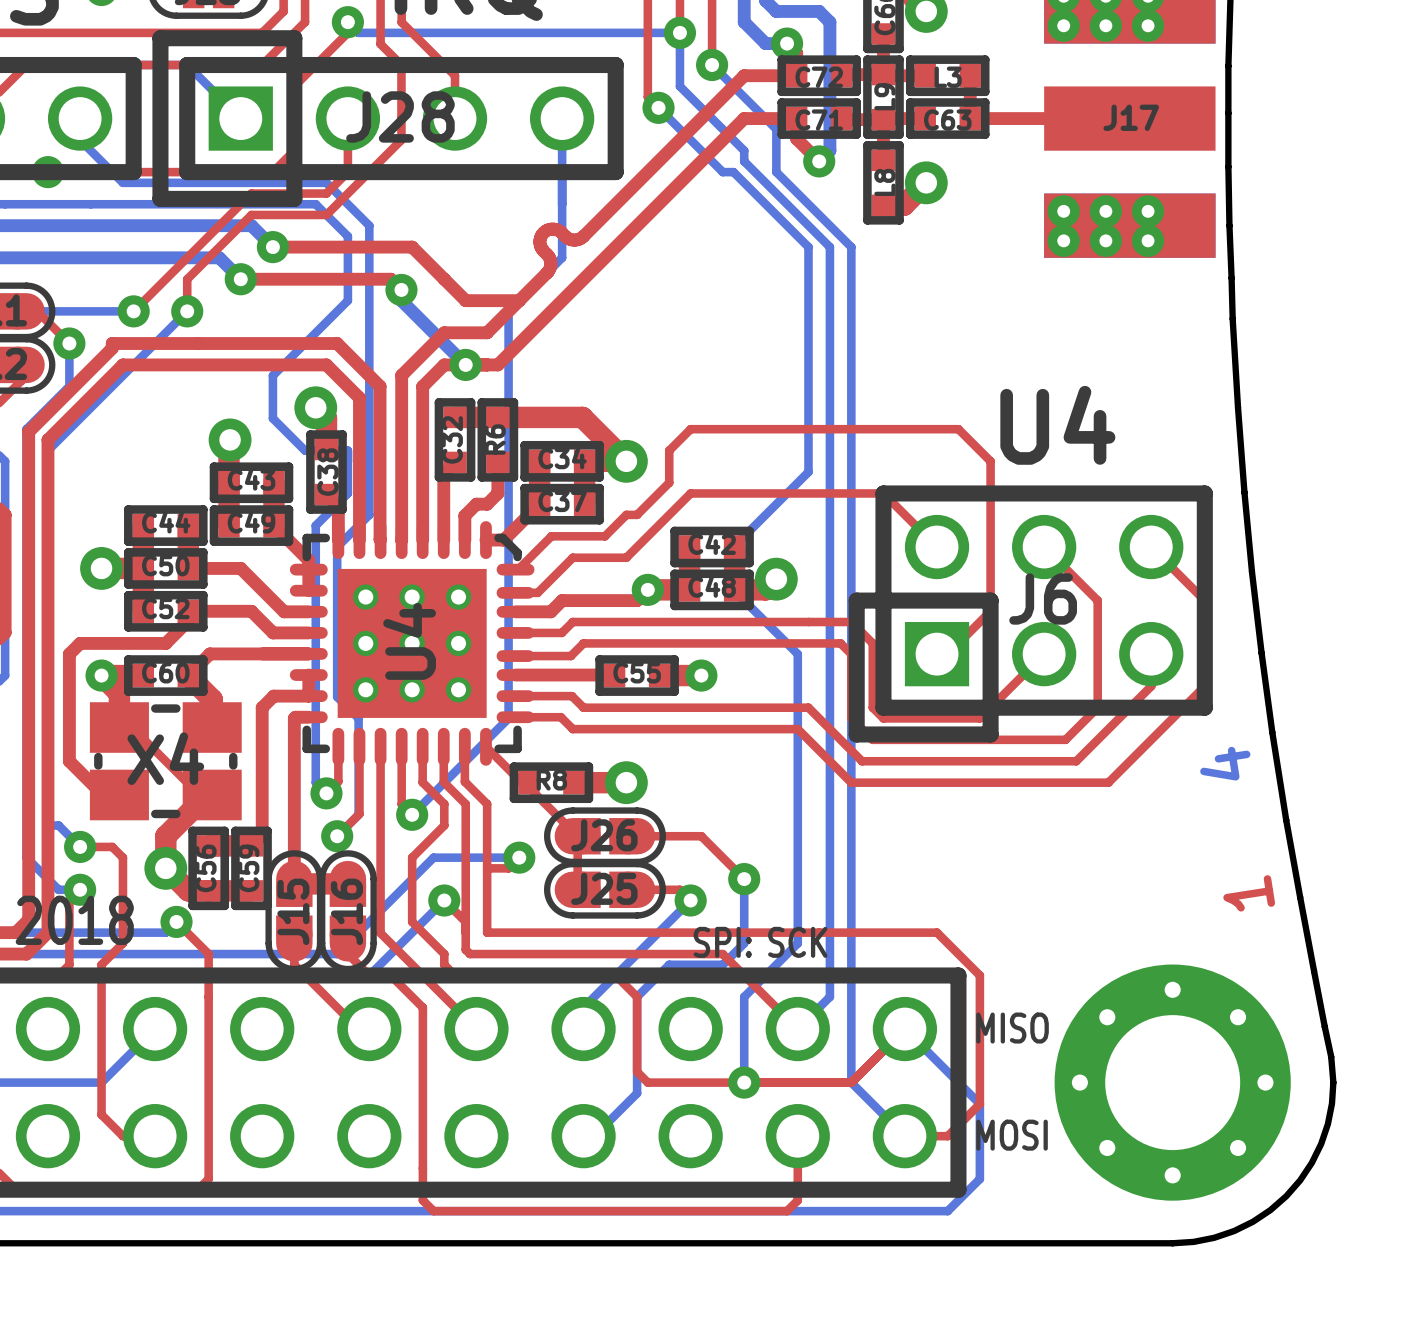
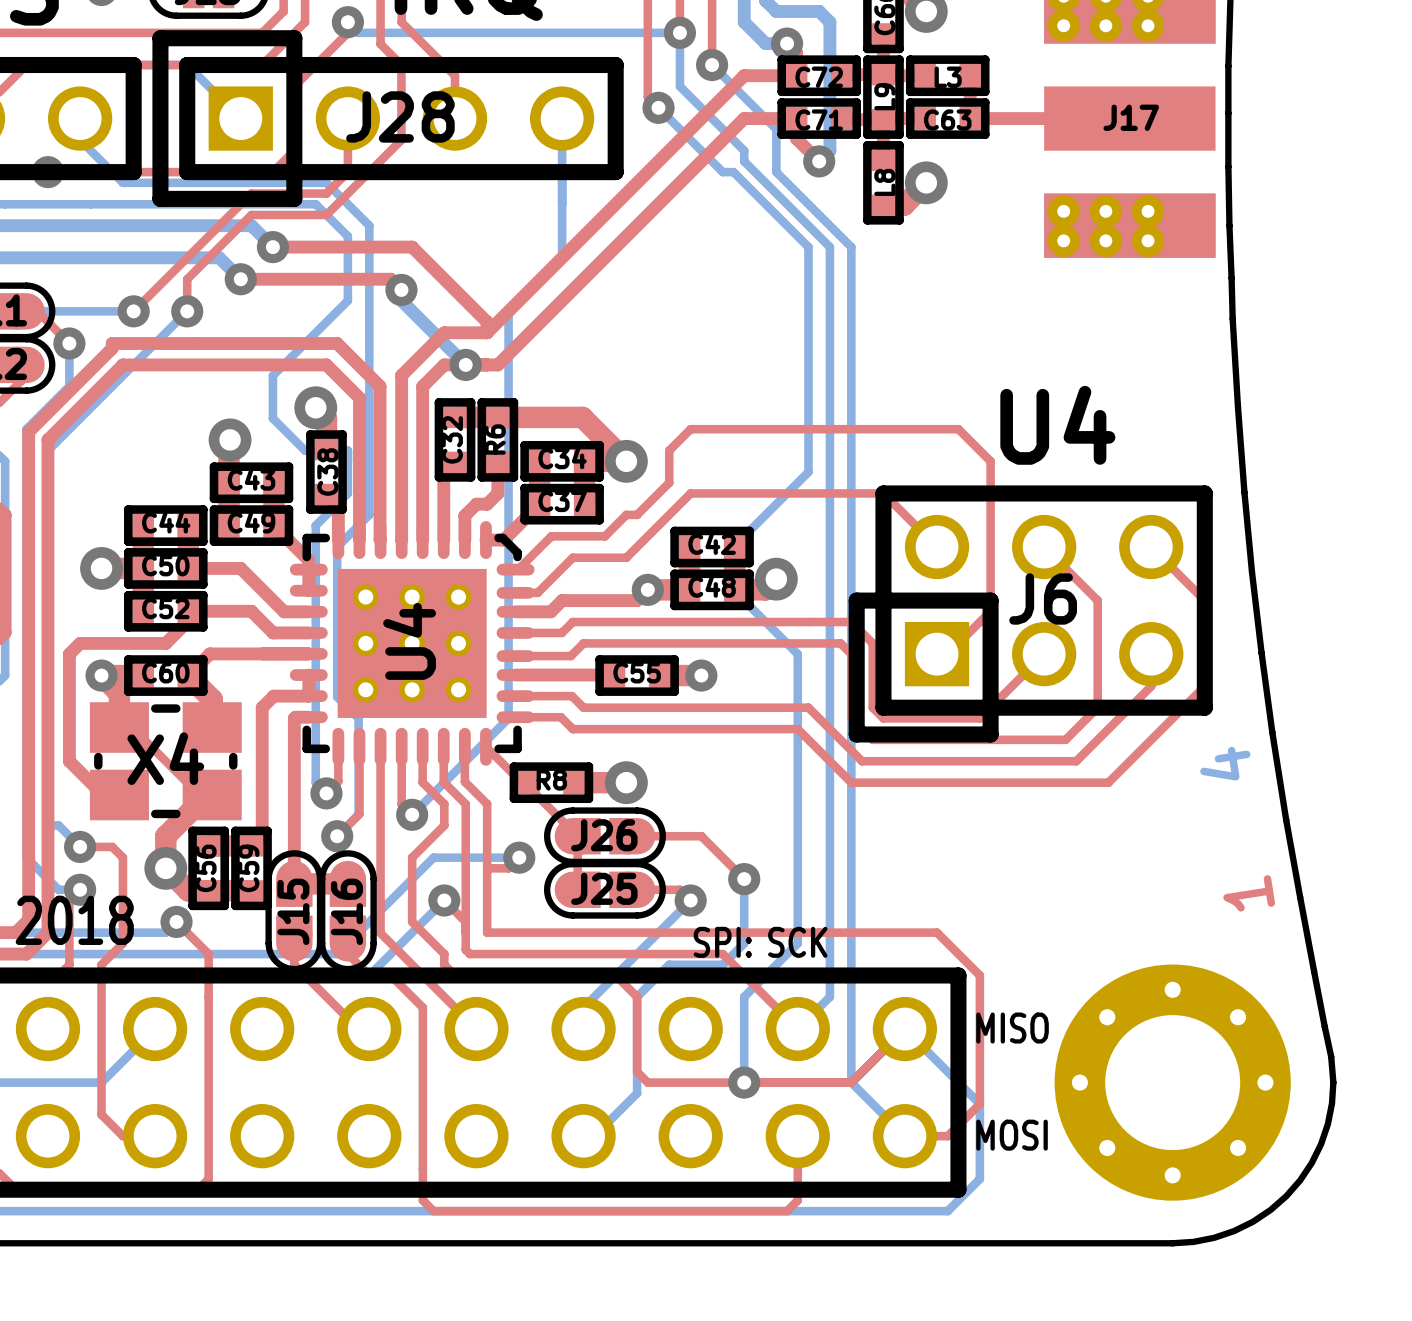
top track: (583, 236) (575, 240) (570, 239) (554, 229) (543, 232) (539, 240) (540, 246) (550, 262) (547, 272) -> (583, 236) (547, 272)
top track: (465, 300) (519, 300) -> (465, 300) (487, 322) (487, 332)

